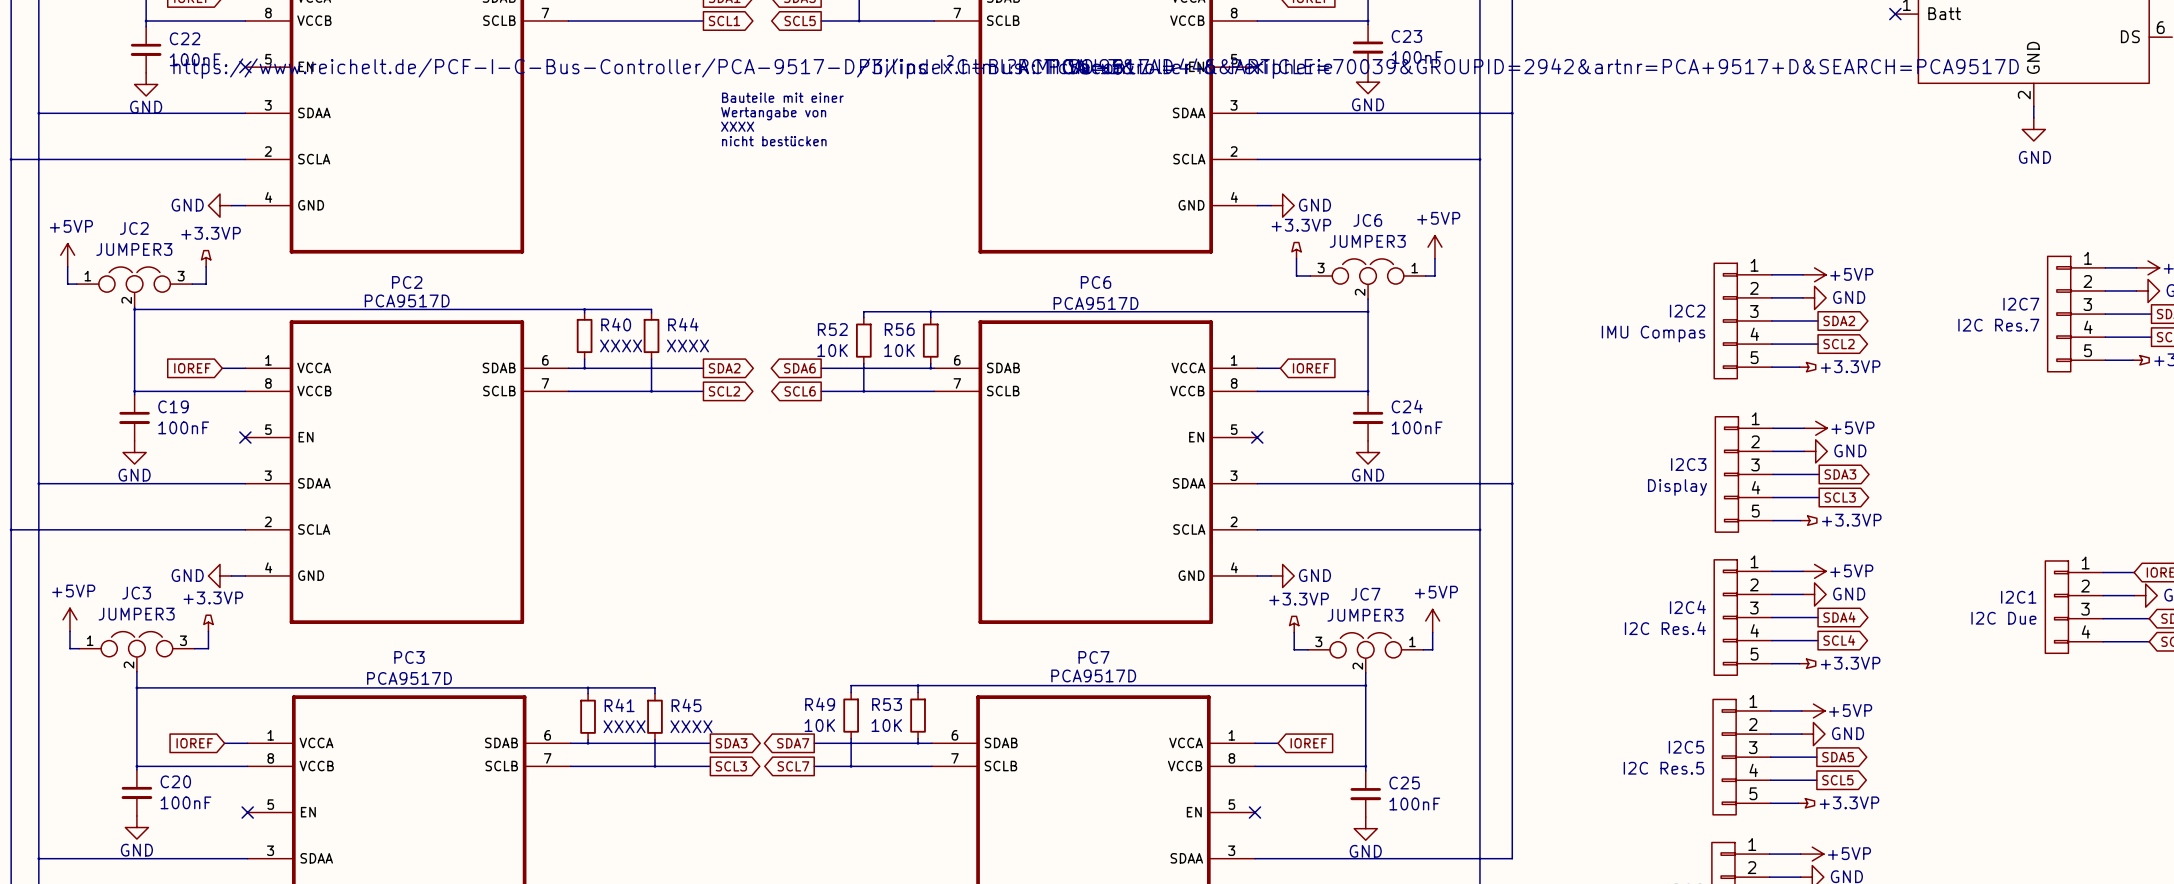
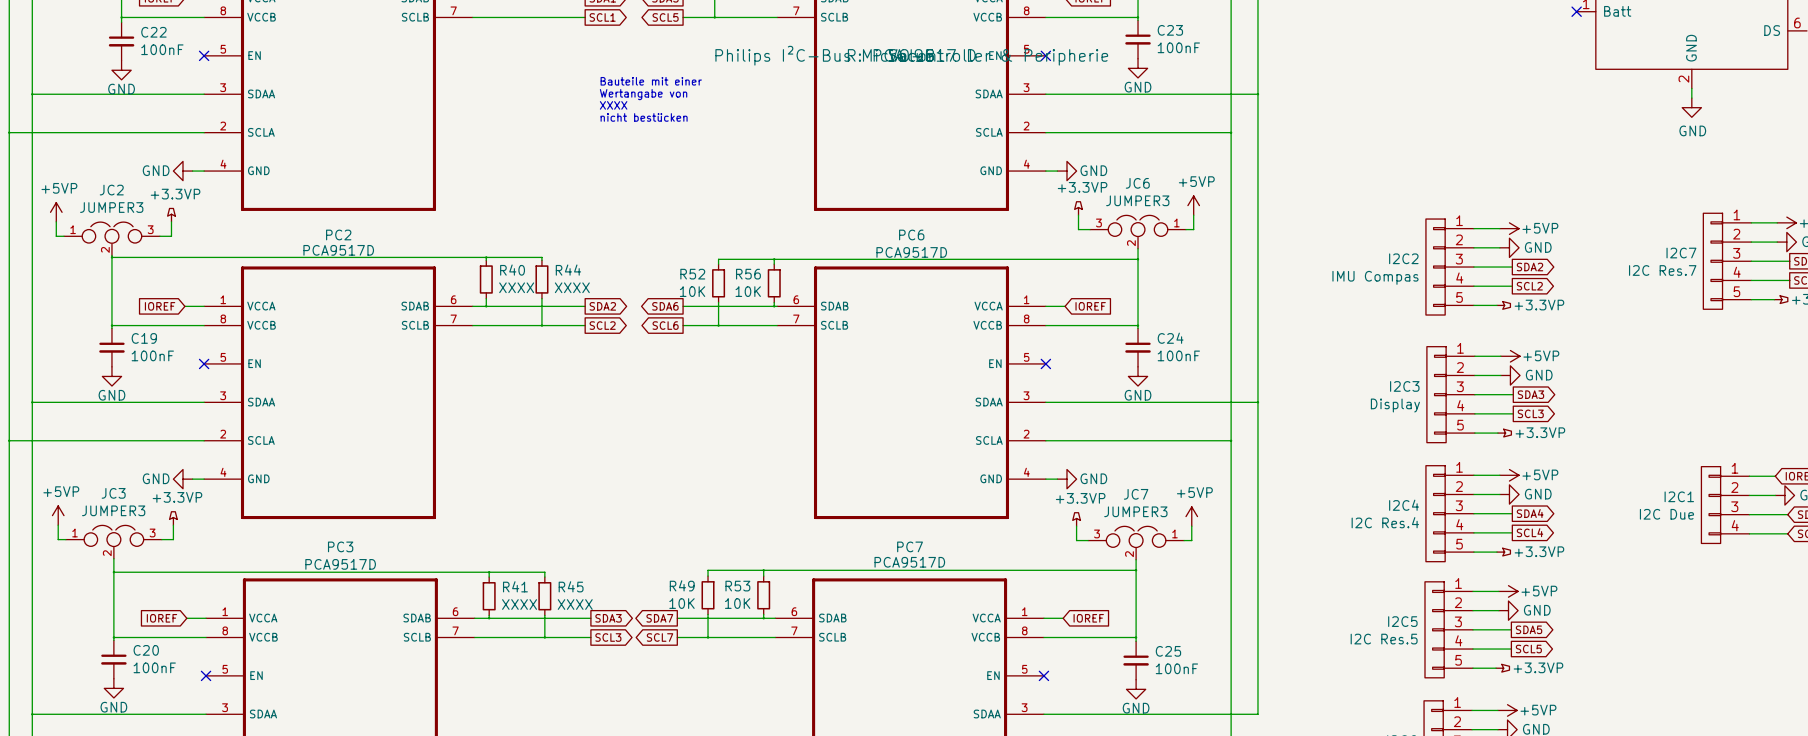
part text: https://www.reichelt.de/PCF-I-C-Bus-Controller/PCA-9517-D/3/index.html?ACTION=3&LA=446&ARTICLE=70039&GROUPID=2942&artnr=PCA+9517+D&SEARCH=PCA9517D (1096, 68) -> none

